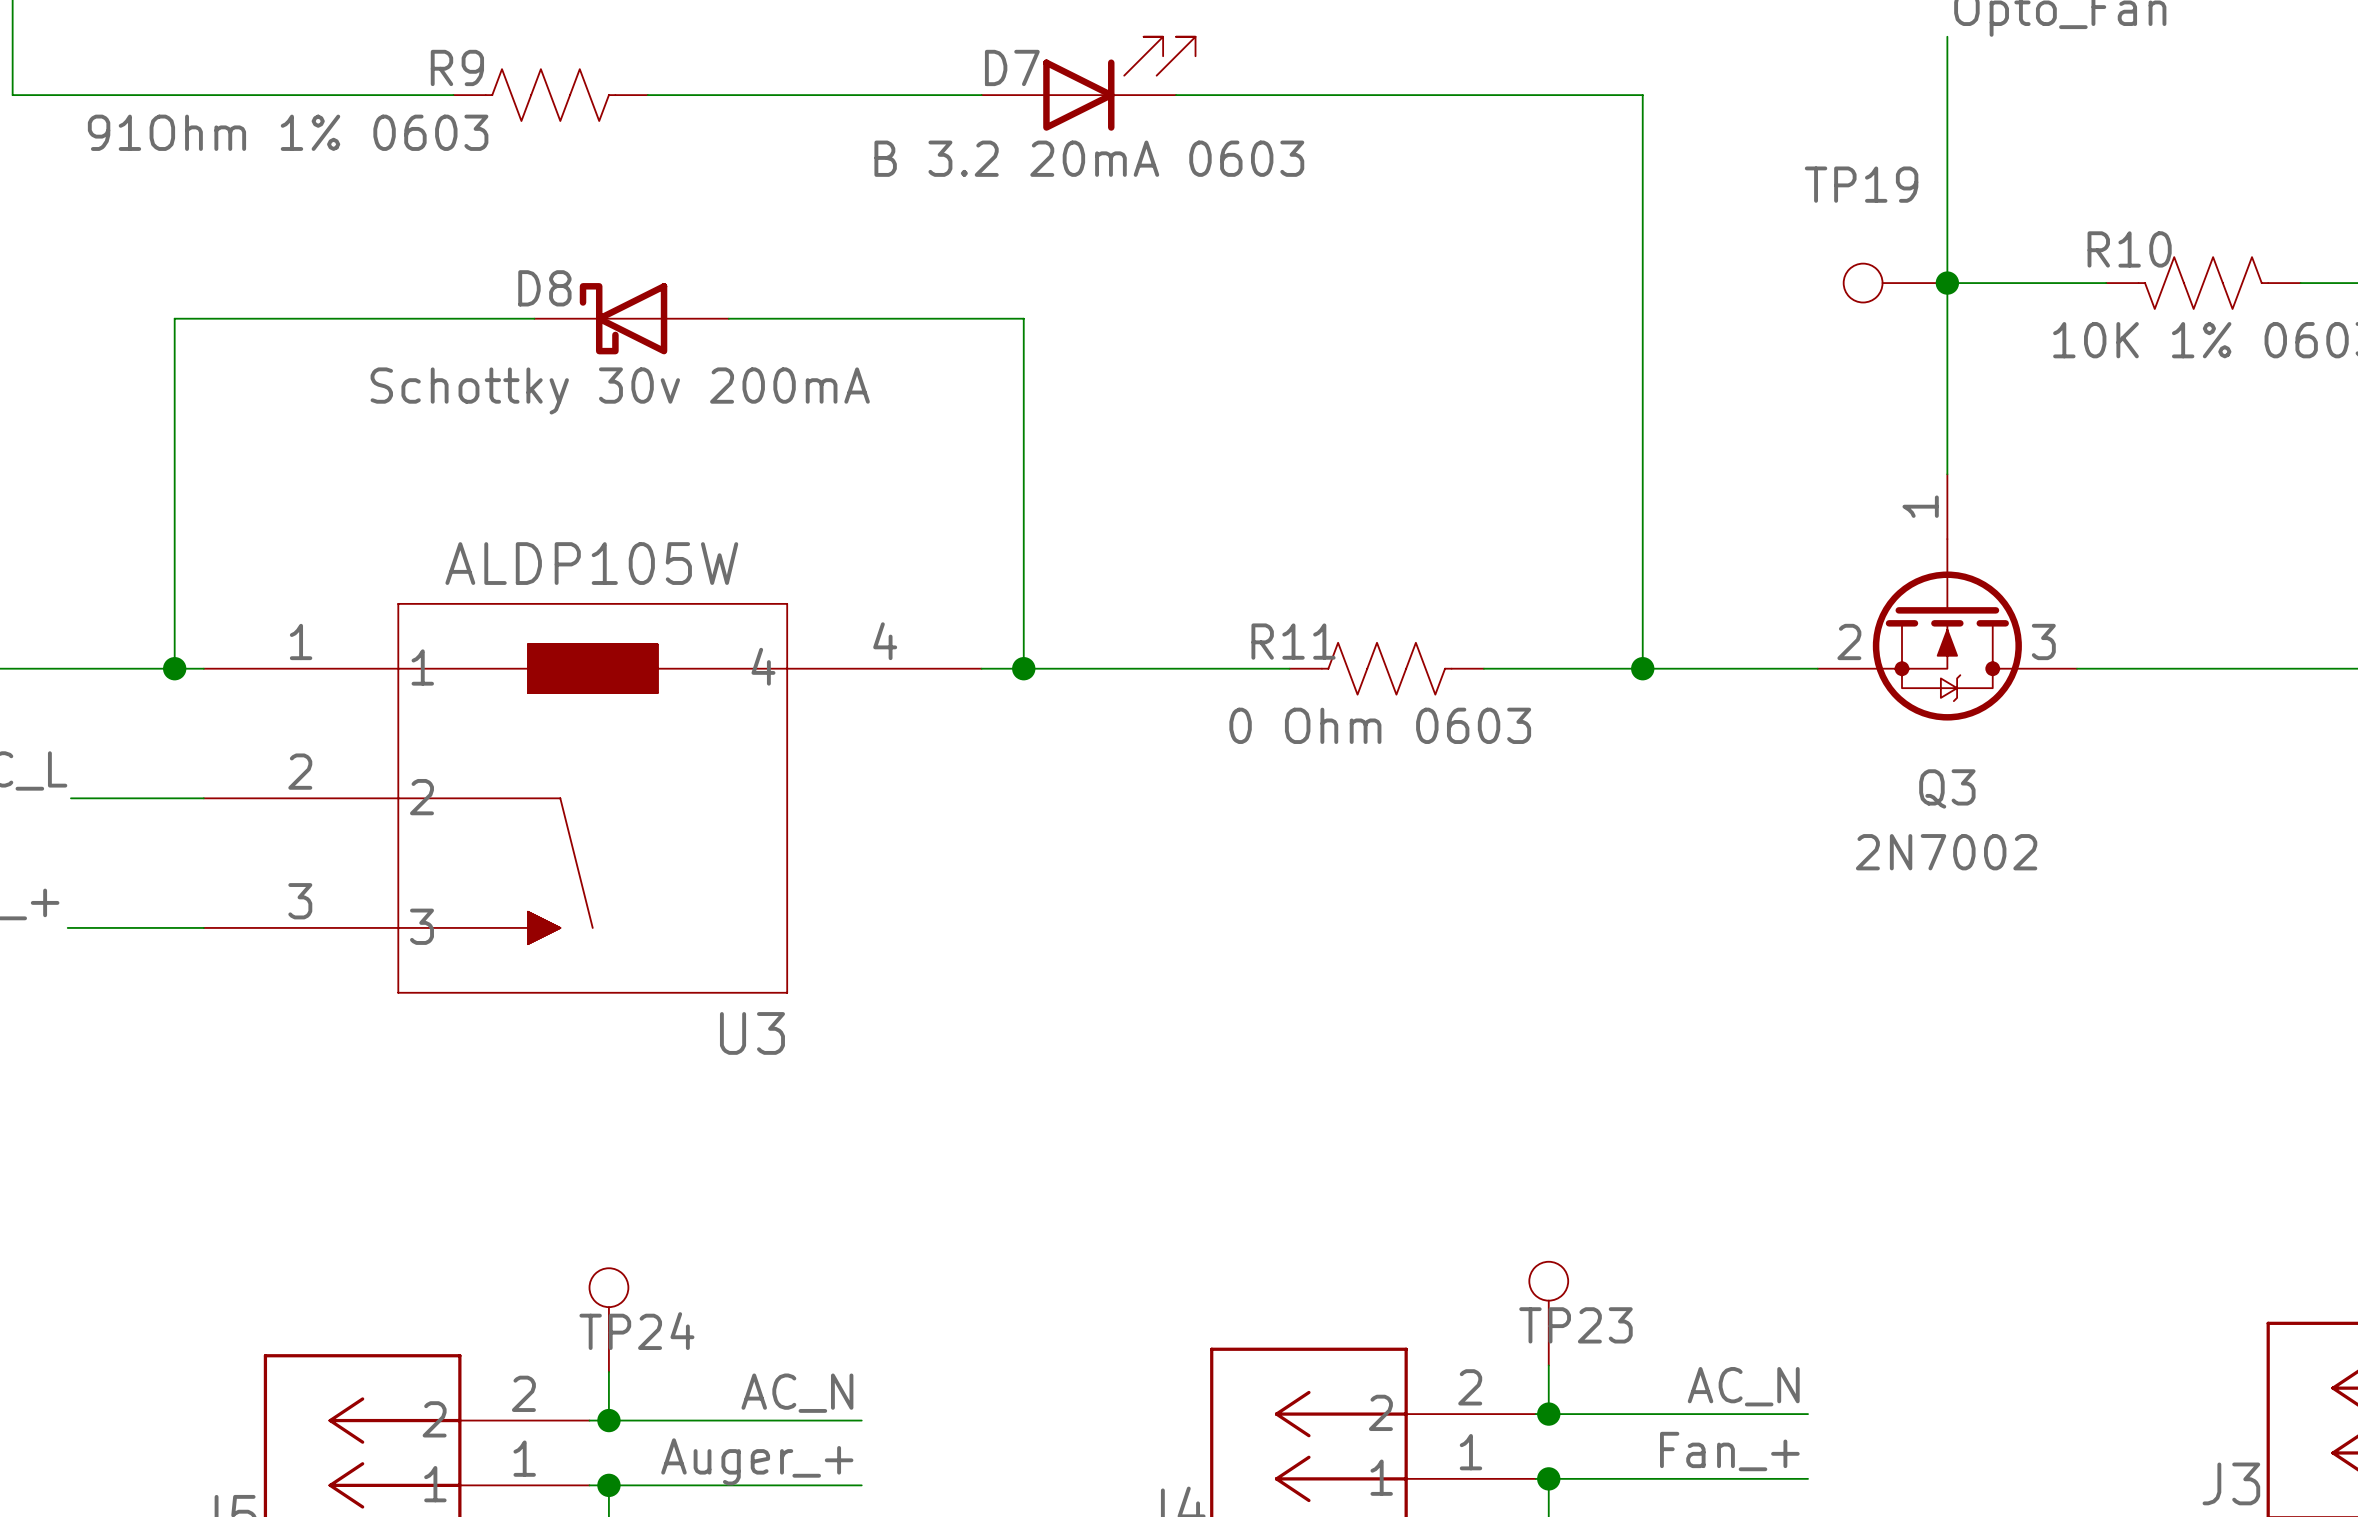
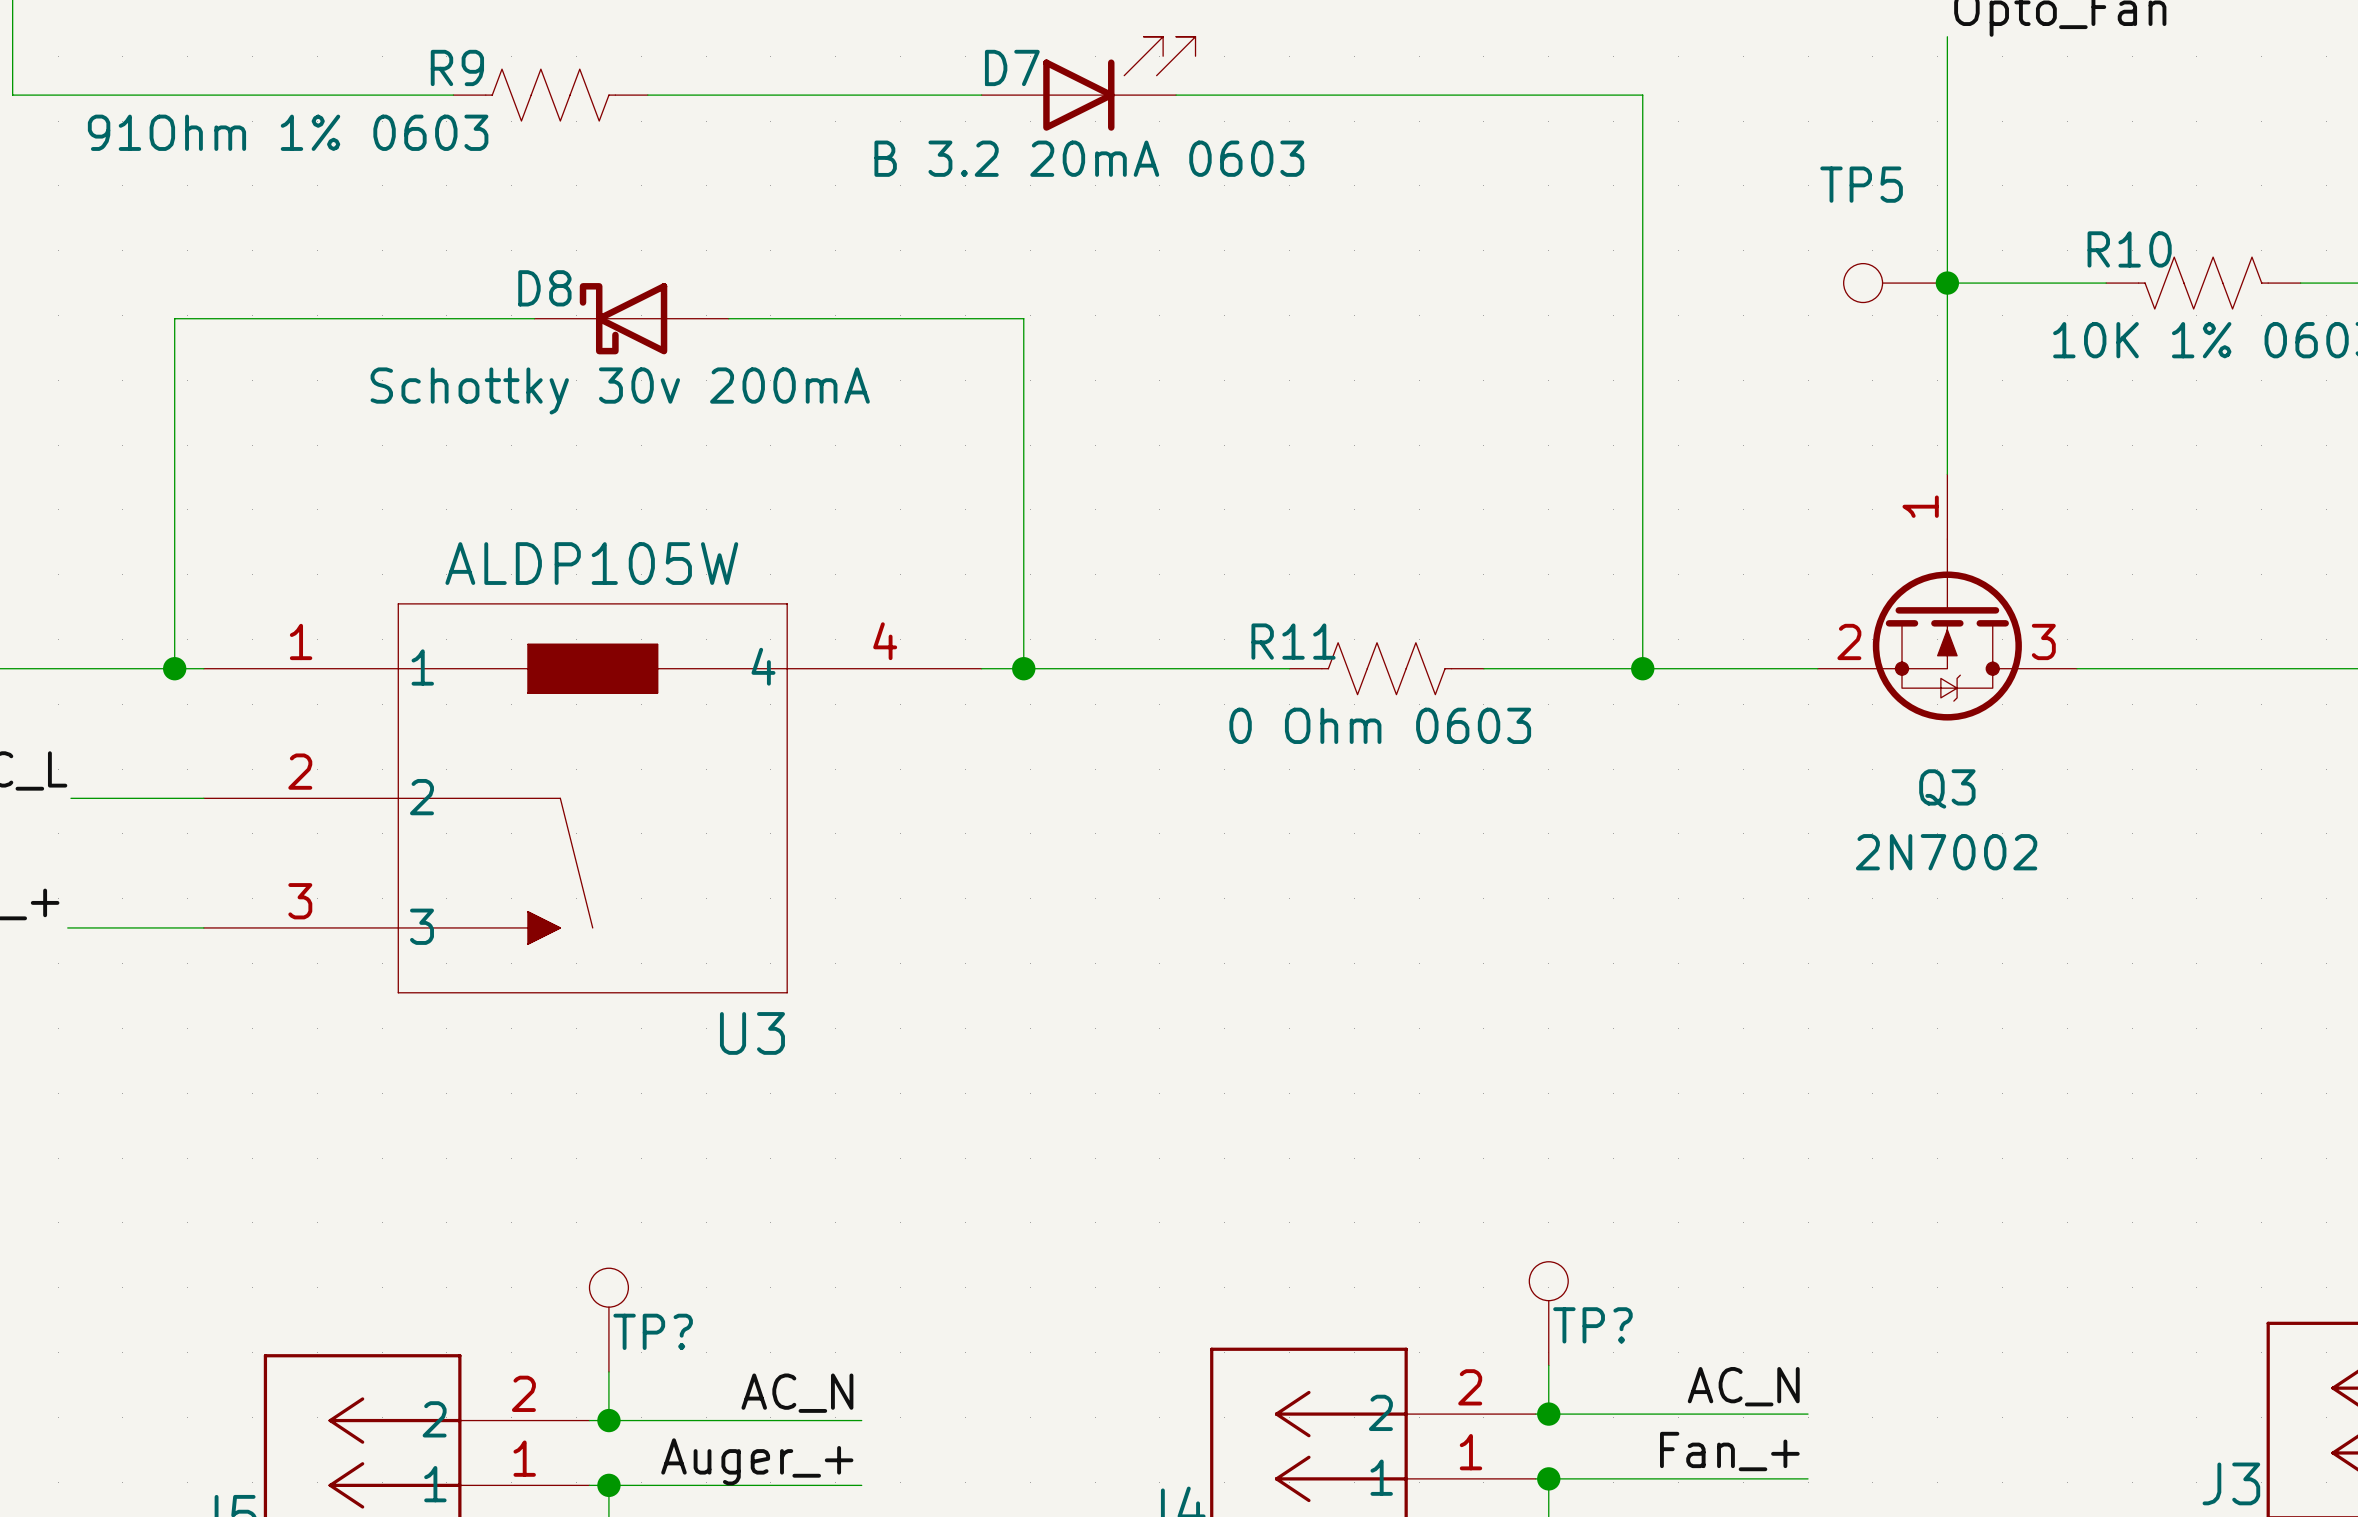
TP19 name: TP19 (1861, 184) -> TP5 (1861, 184)
TP23 name: TP23 (1575, 1325) -> TP? (1592, 1325)
TP24 name: TP24 (636, 1331) -> TP? (653, 1331)

